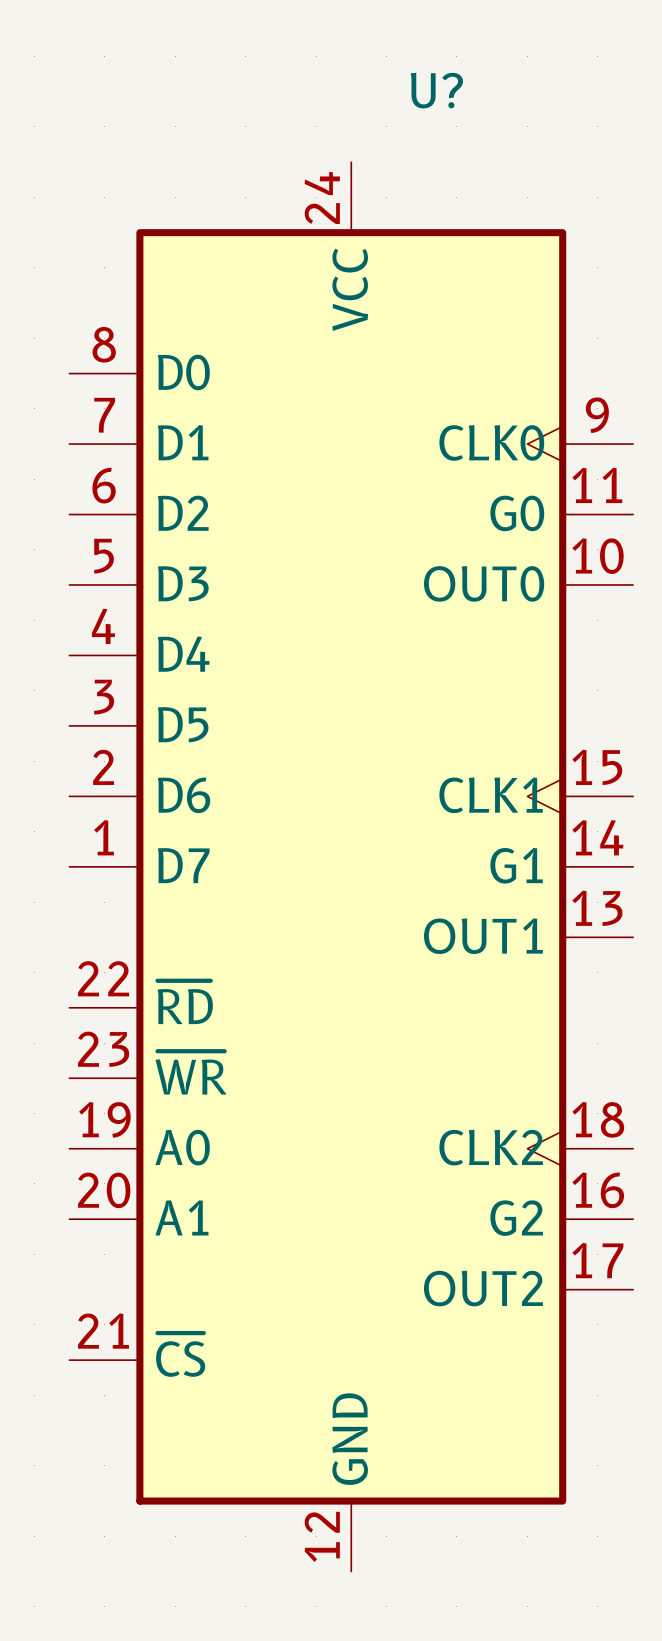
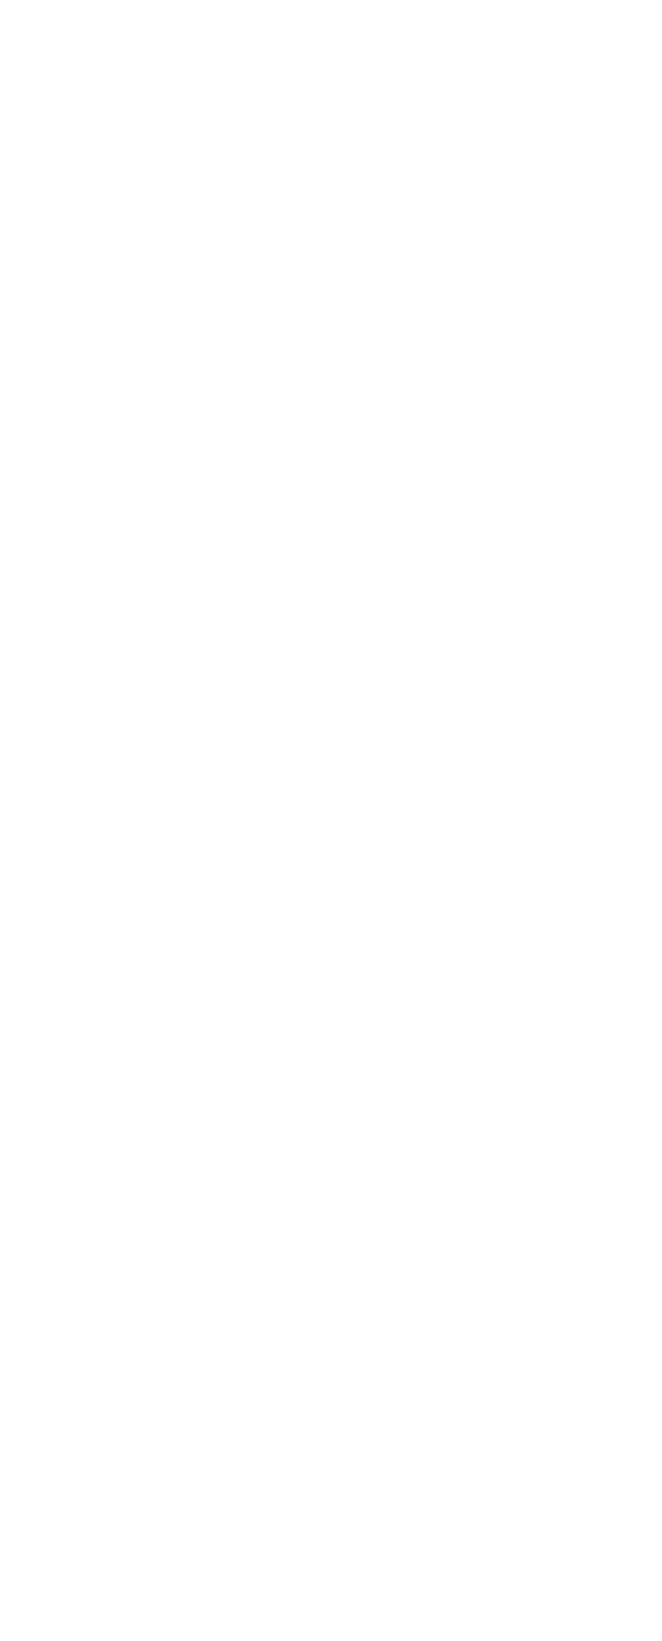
U?: (351, 866) -> none

